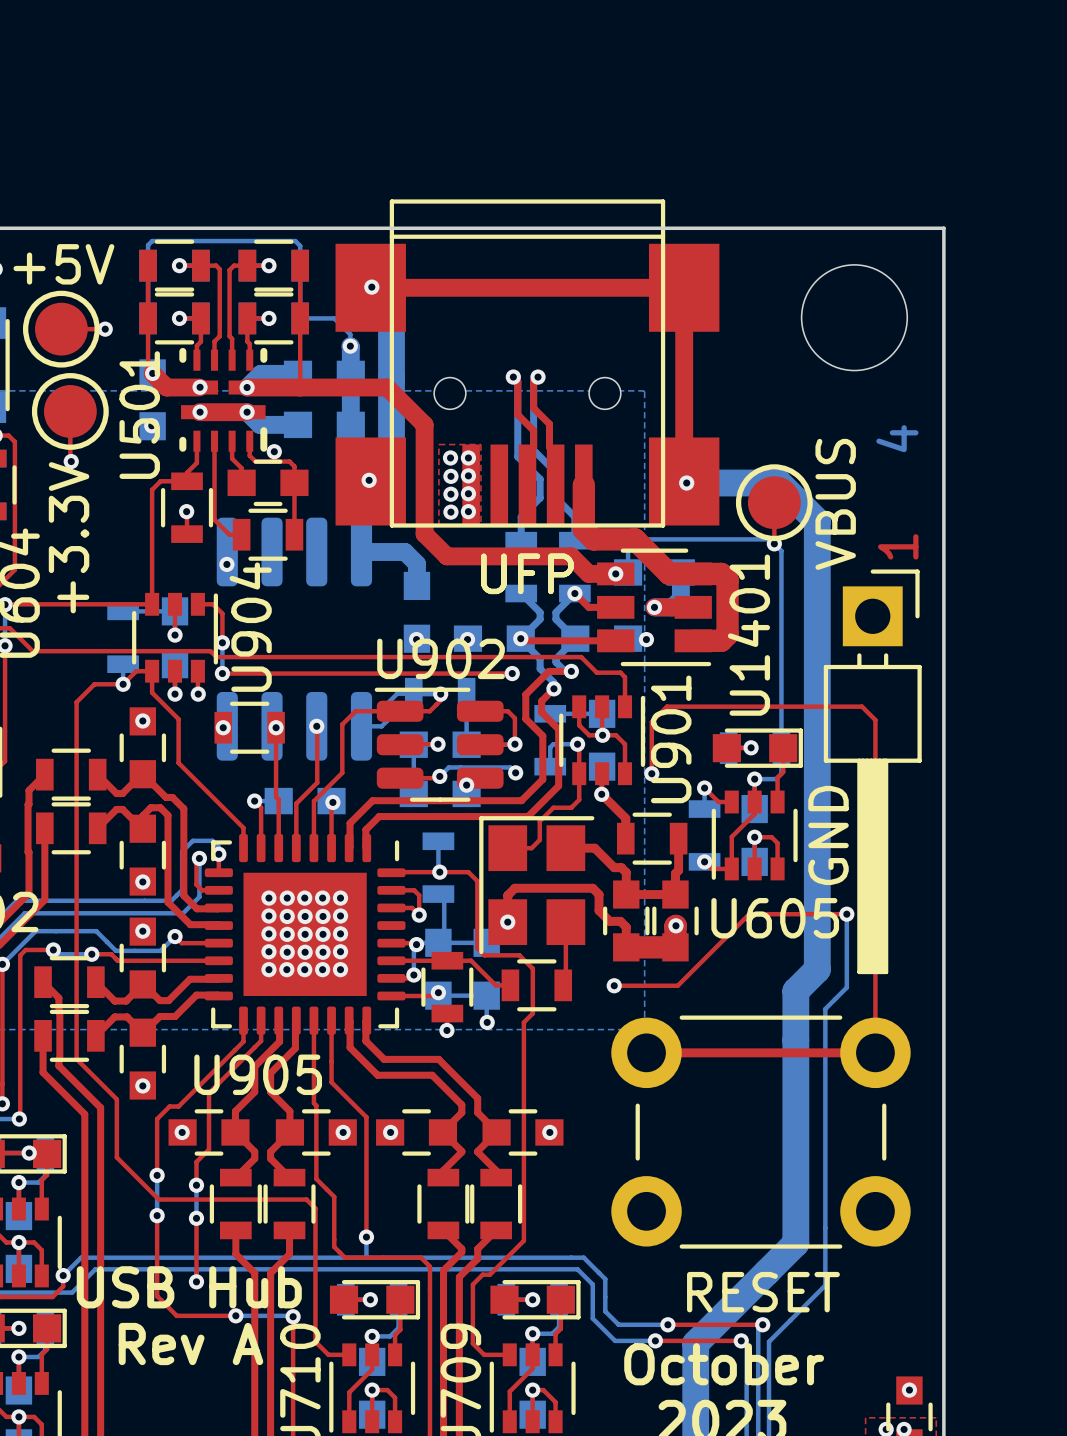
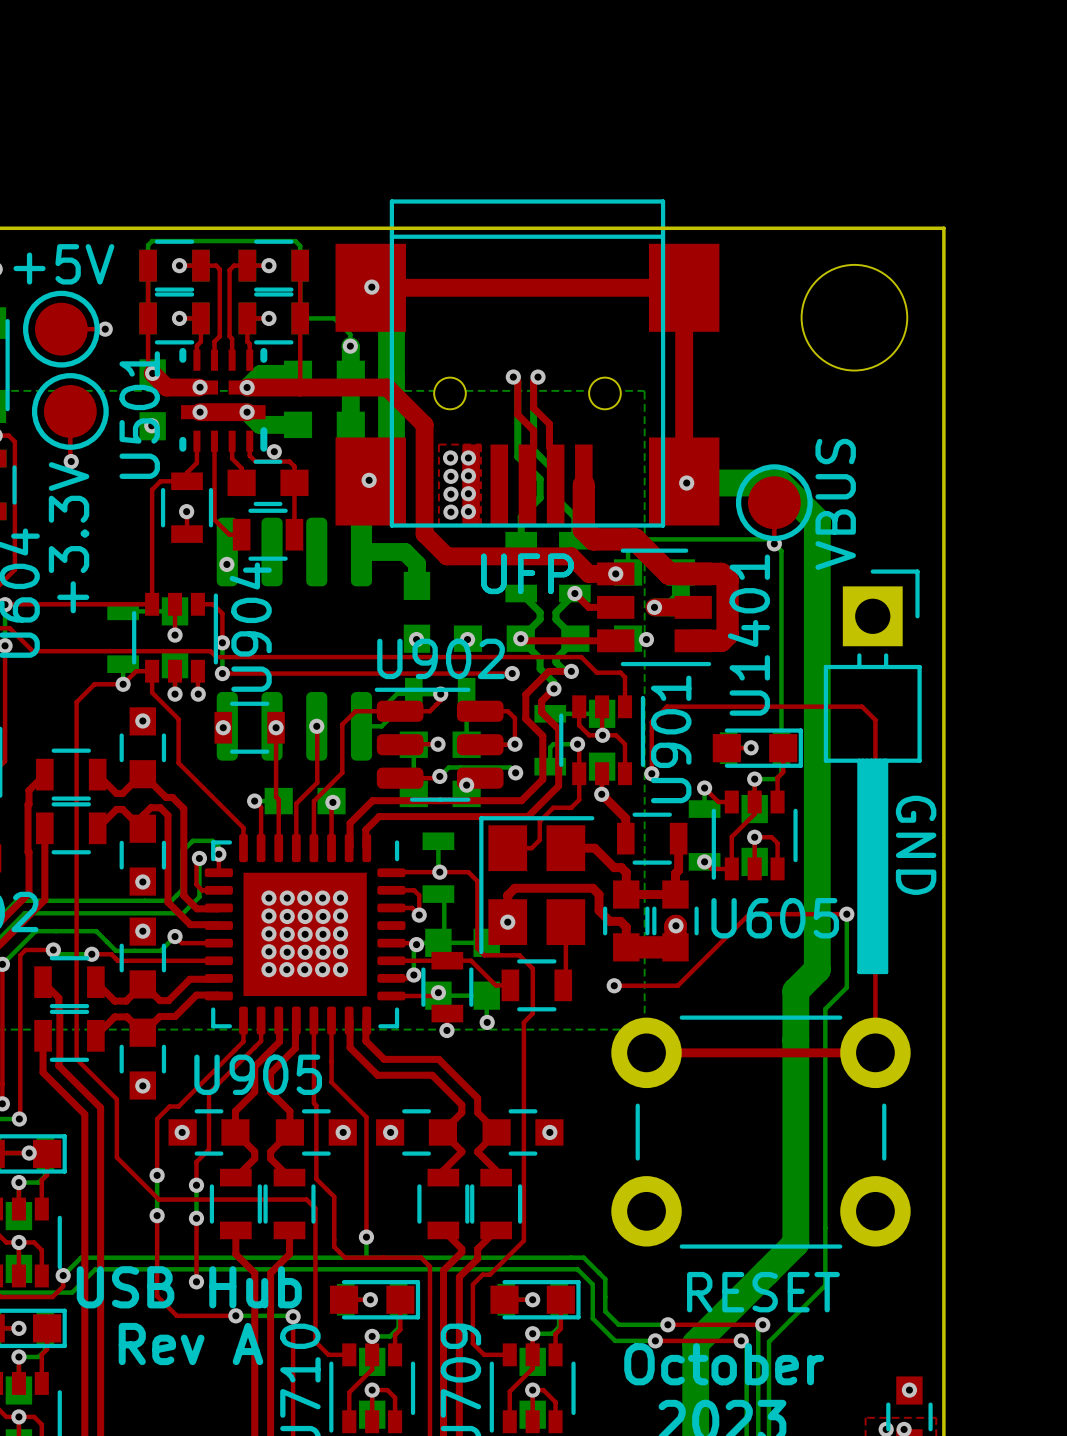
text: 4 (897, 438) -> none
text: 1 (898, 546) -> none
text rotation: 0° (828, 835) -> 180° (916, 845)

